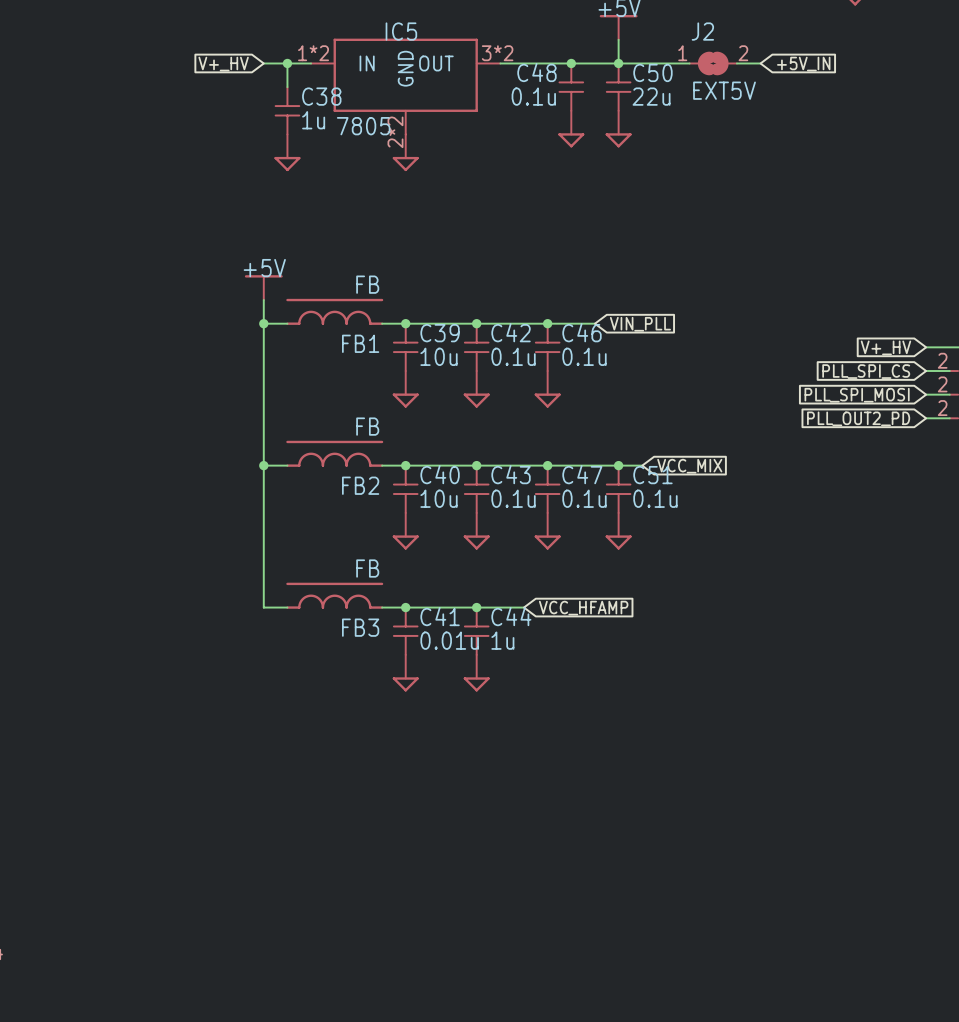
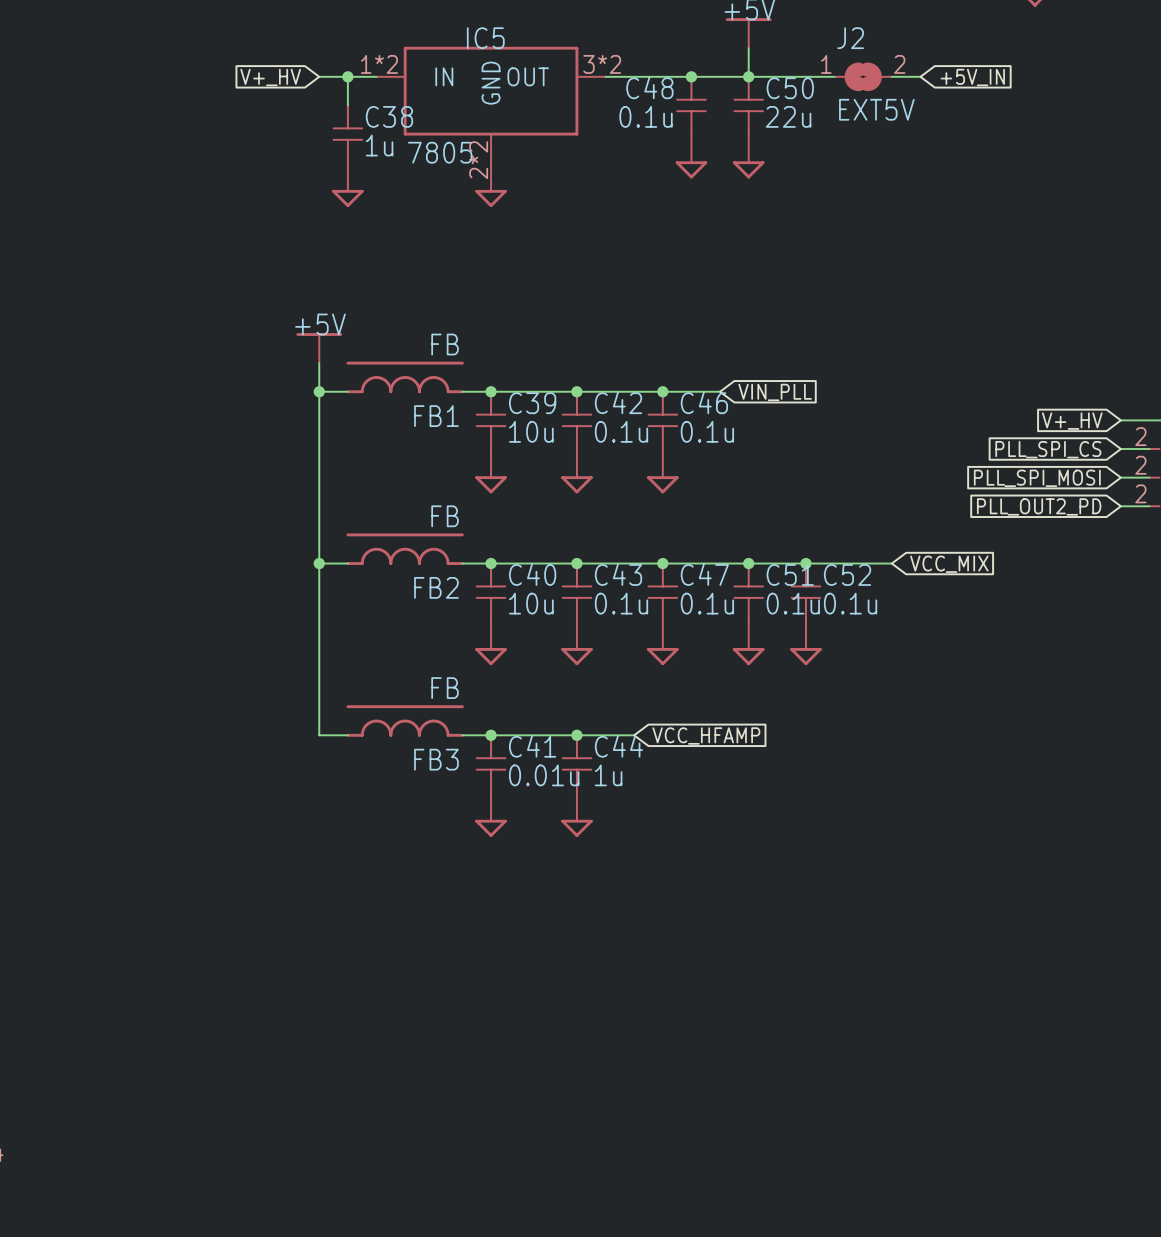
wire: none -> (777, 563) (891, 563)
junction: none -> (805, 563)
global label position: VCC_MIX (689, 466) -> VCC_MIX (949, 564)
C52: none -> 0.1u (805, 592)
power symbol: none -> (805, 642)

